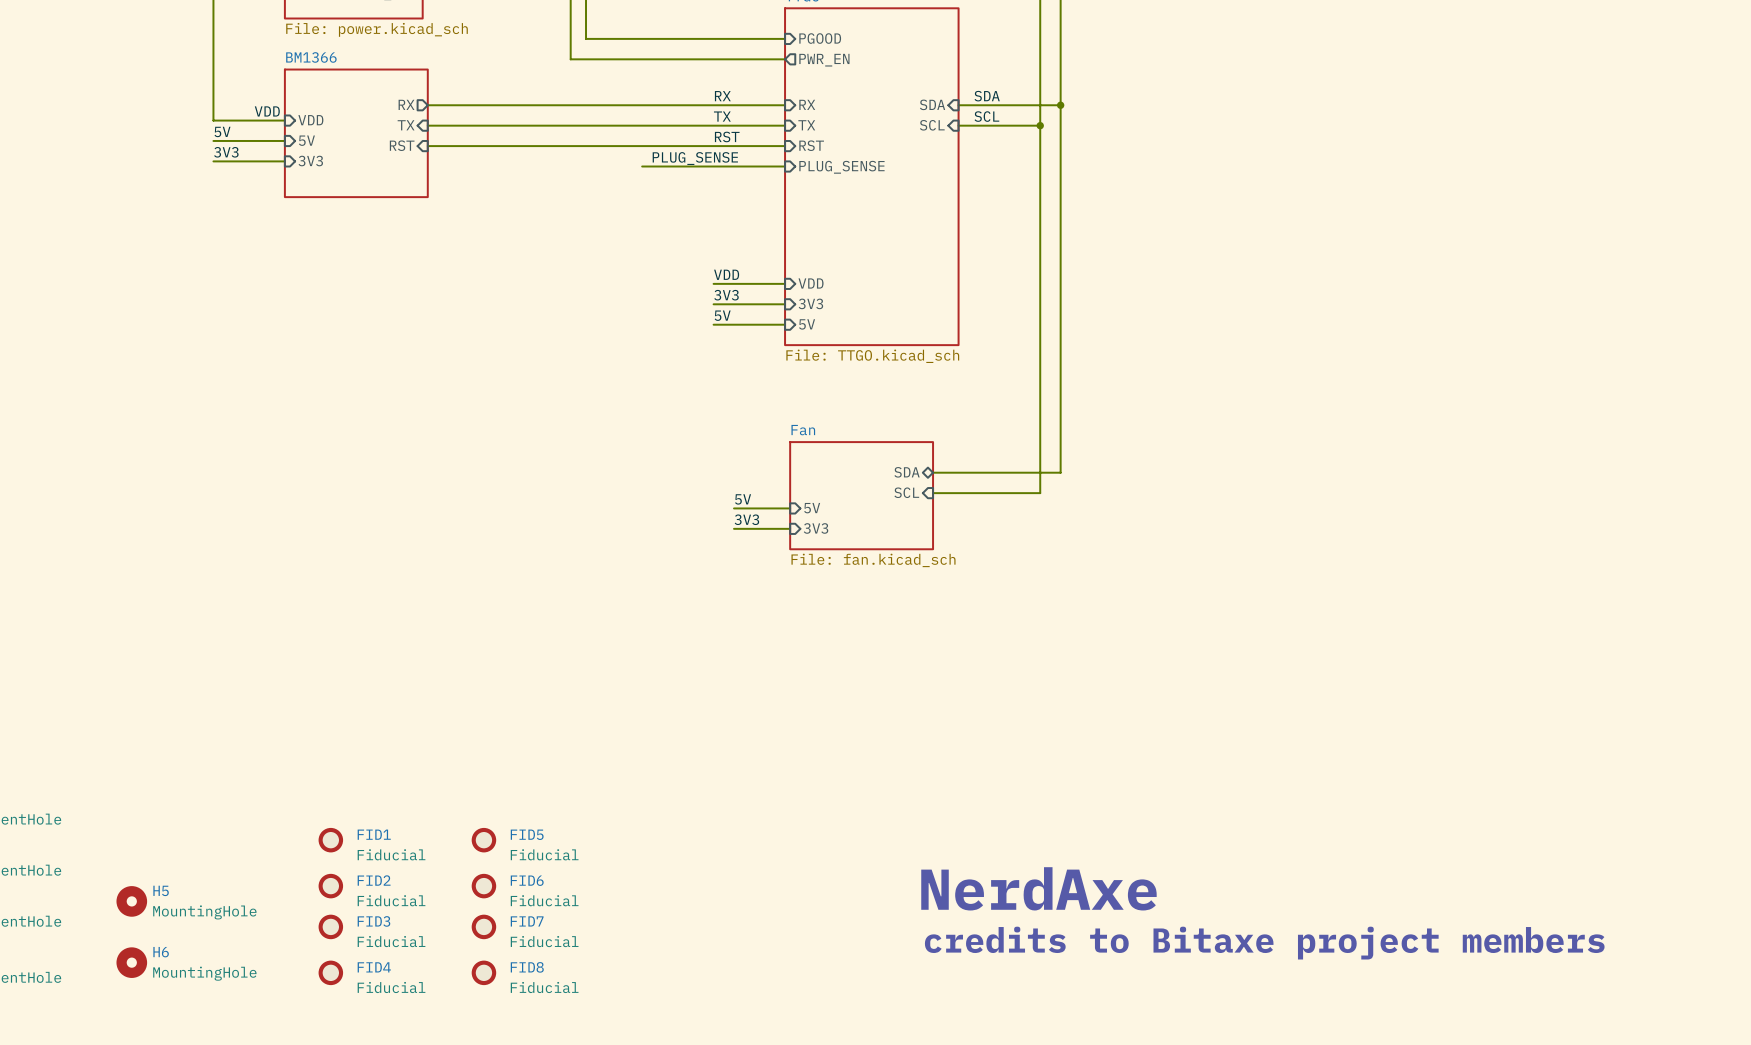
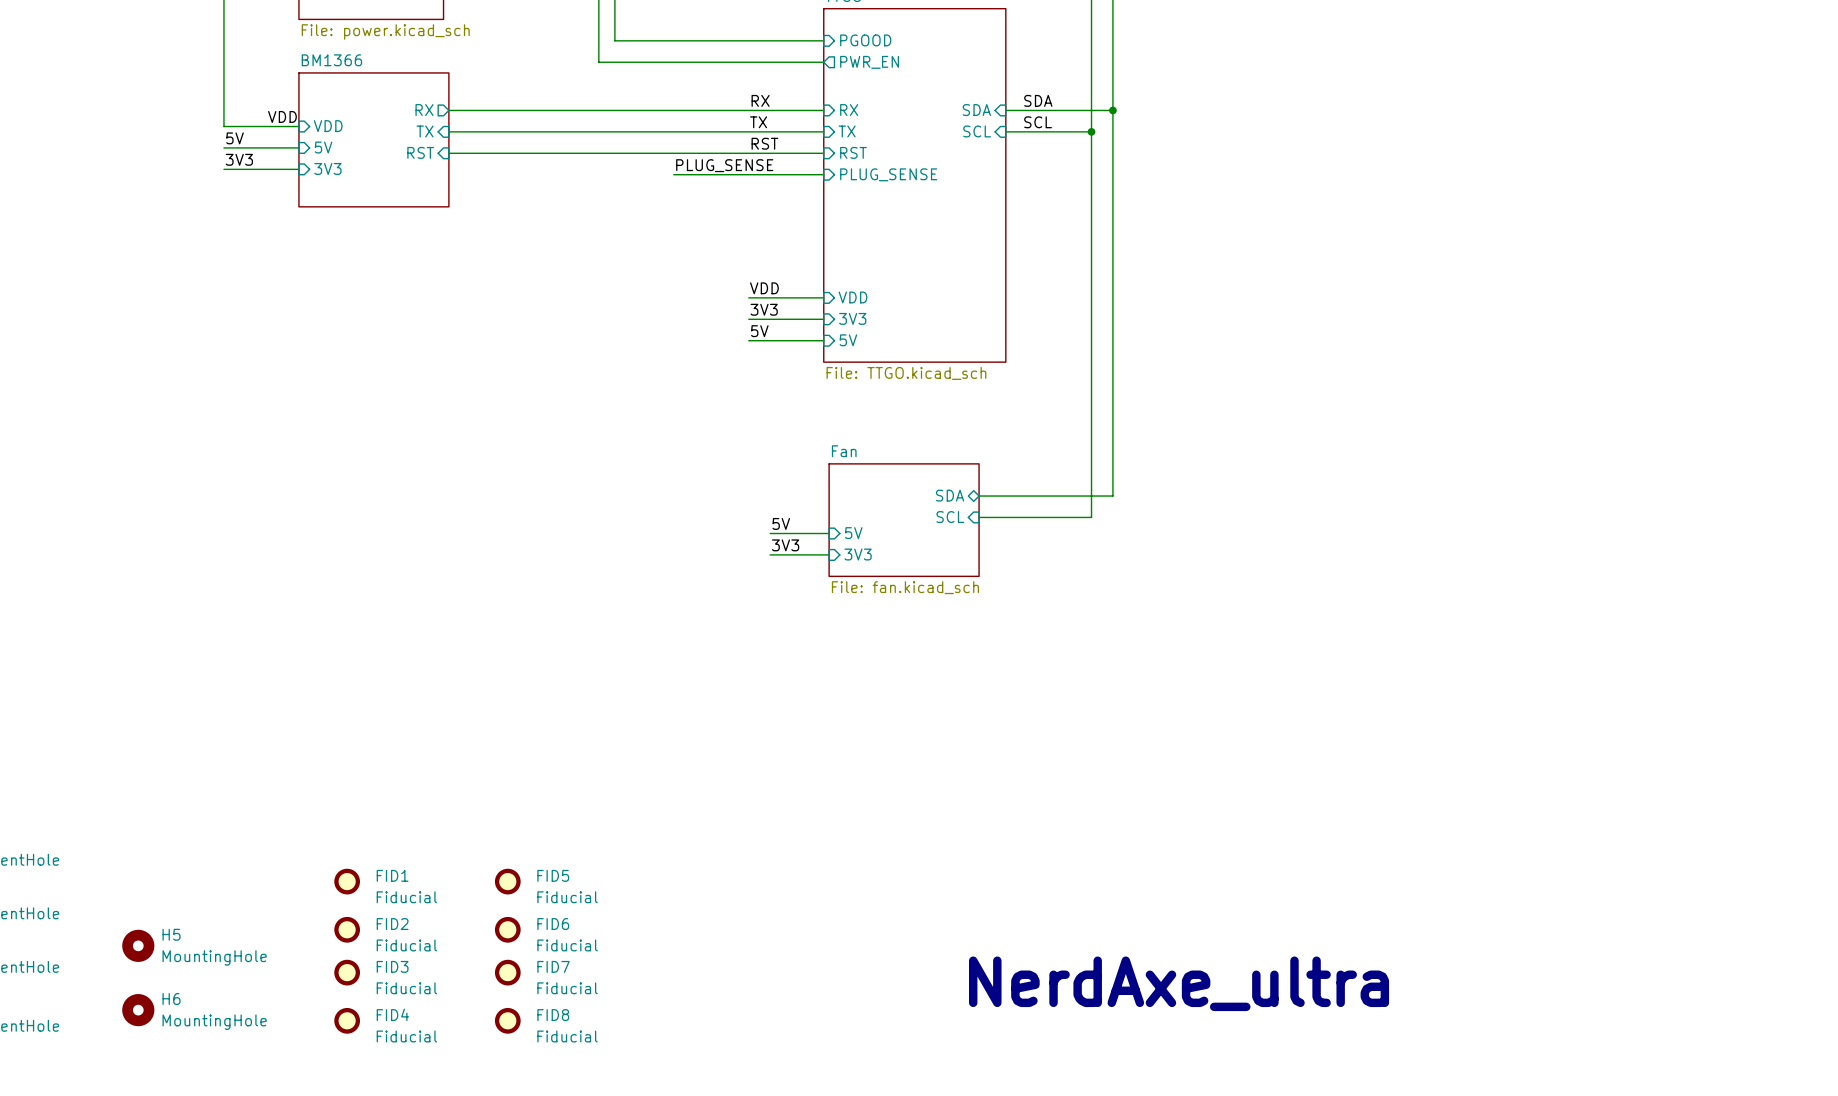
text: NerdAxe (1038, 888) -> NerdAxe_ultra (1179, 983)
text: credits to Bitaxe project members (1264, 943) -> none

